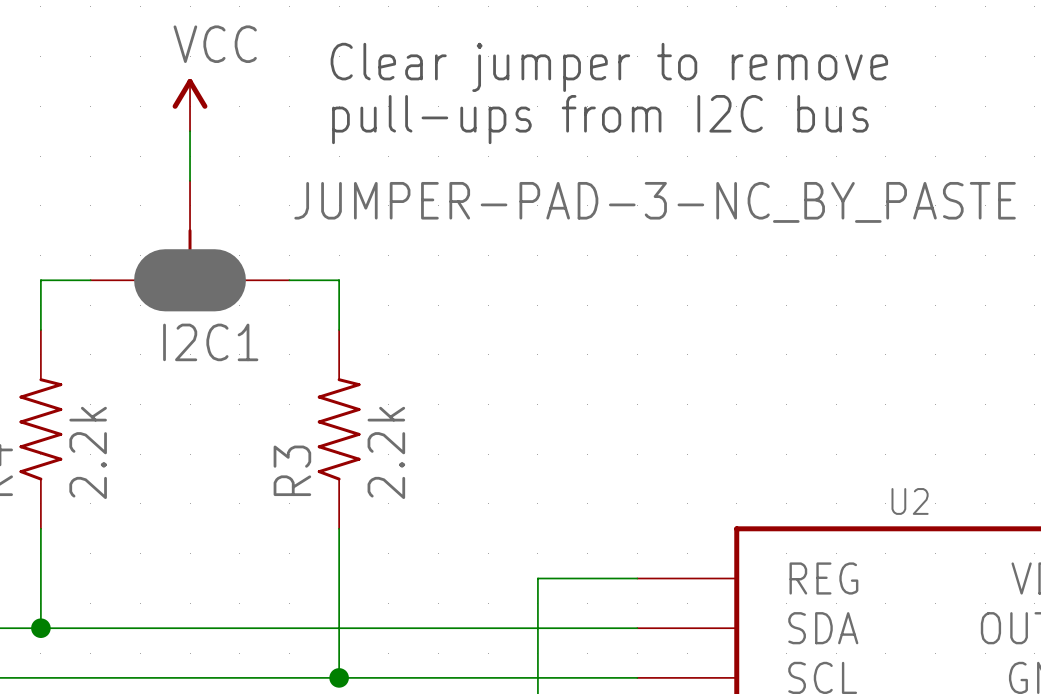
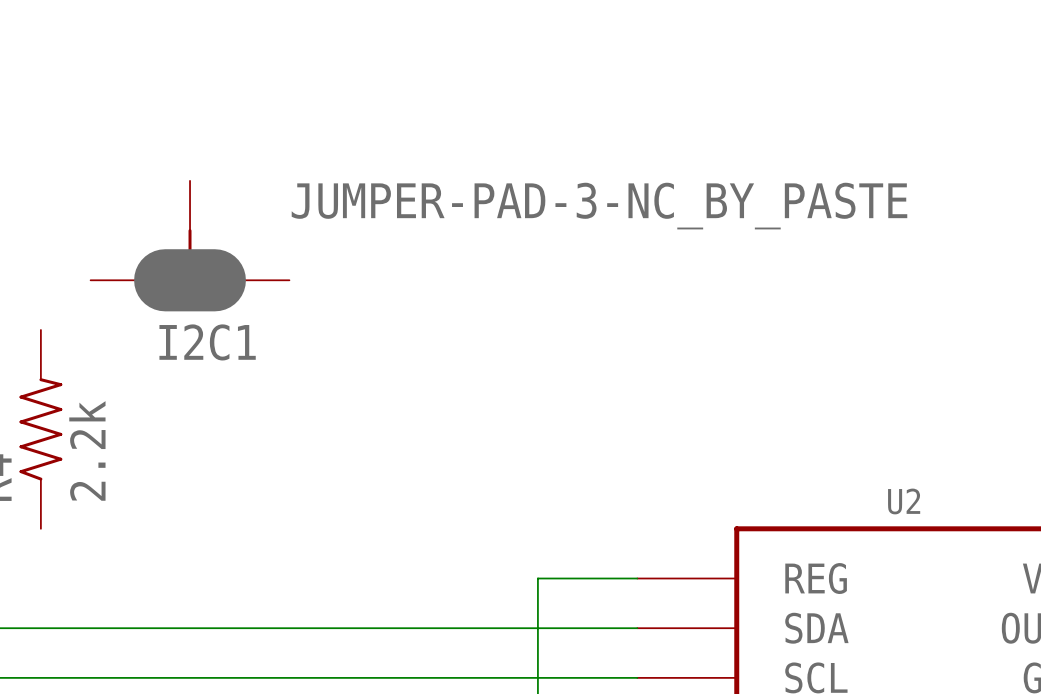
text: Clear jumper to remove (609, 67) -> none
power symbol: VCC (190, 105) -> none
text: pull-ups from I2C bus (600, 119) -> none
wire: (190, 131) (190, 180) -> none
wire: (90, 280) (40, 280) (40, 329) -> none
wire: (289, 280) (339, 280) (339, 329) -> none
R3: 2.2k (339, 429) -> none
wire: (40, 528) (40, 628) -> none
wire: (339, 528) (339, 677) -> none
junction: (40, 628) -> none
junction: (339, 677) -> none

